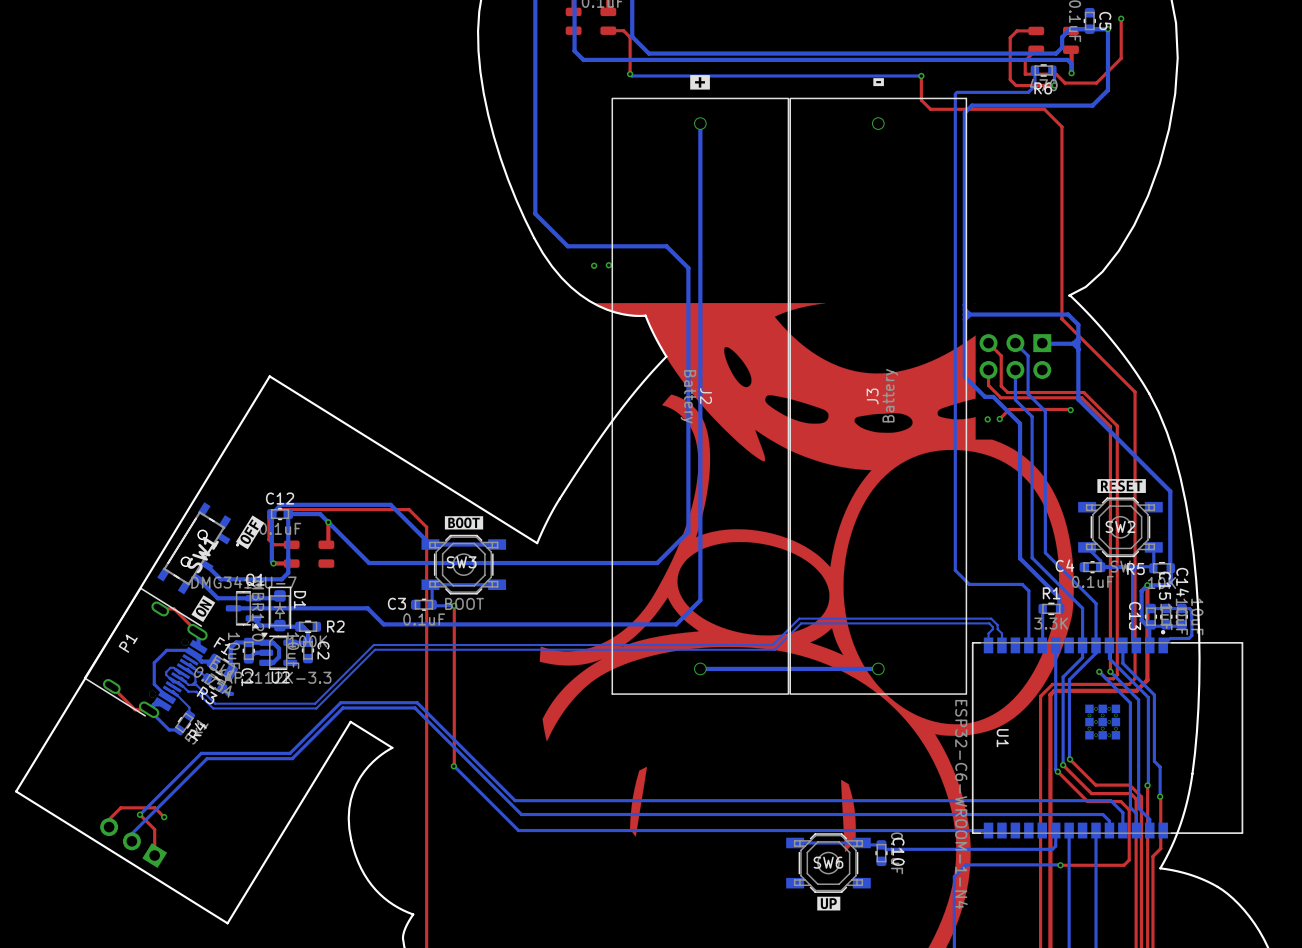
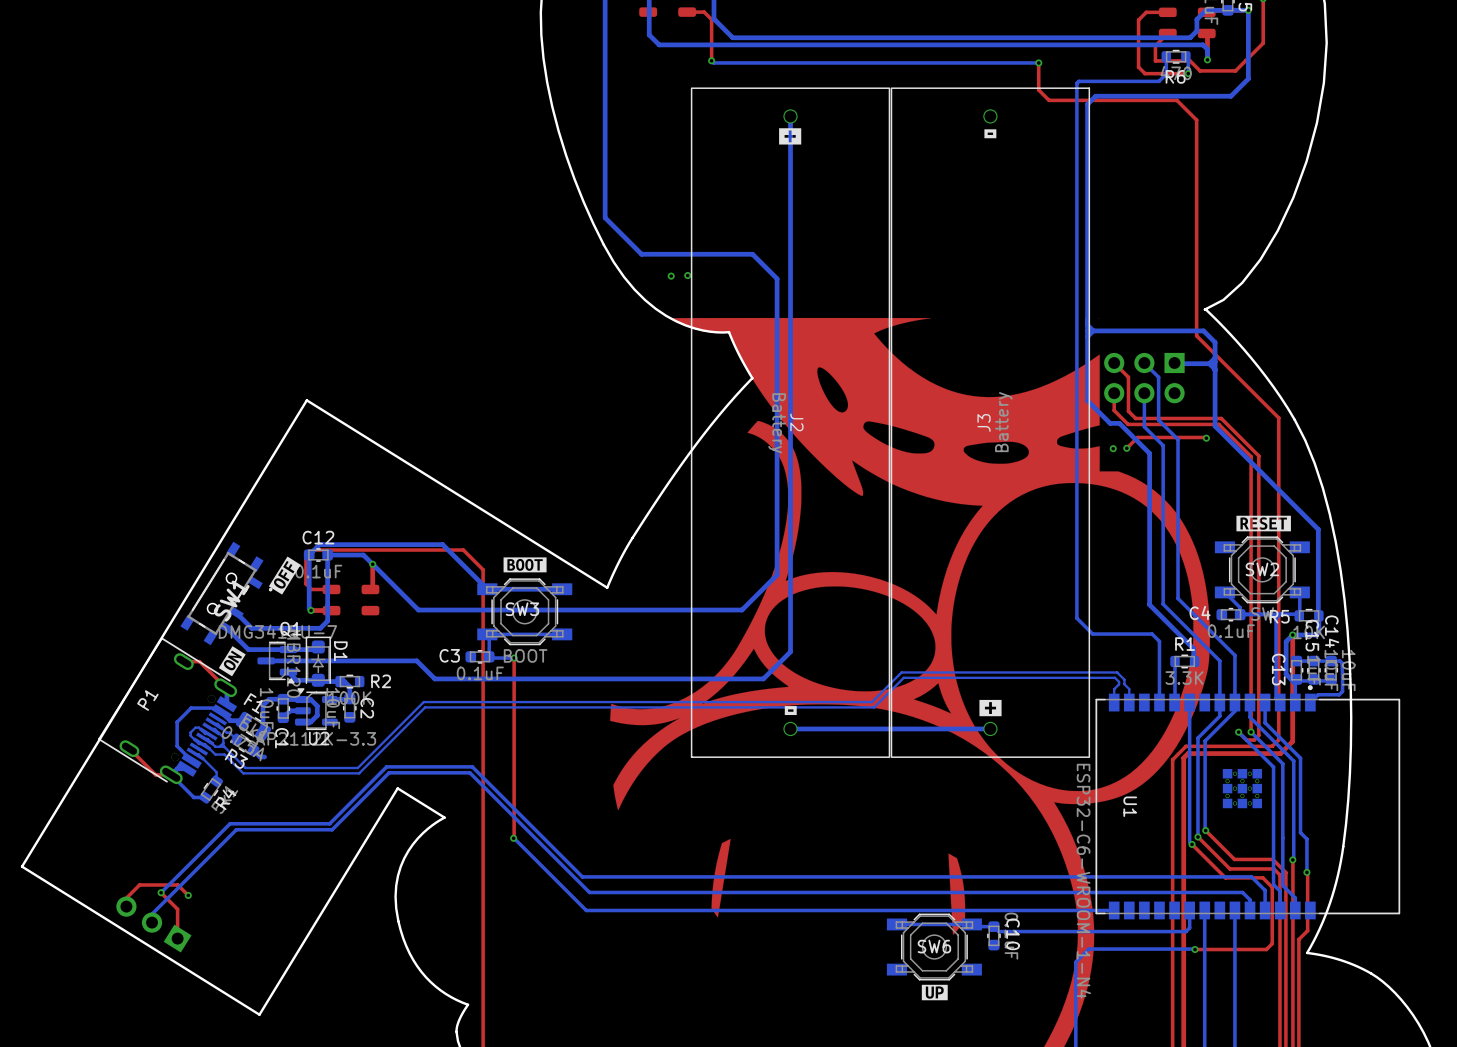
drawing position: (700, 82) -> (790, 136)
drawing position: (878, 82) -> (990, 133)
drawing: none -> [979, 699, 1002, 717]
drawing: none -> [784, 706, 797, 716]

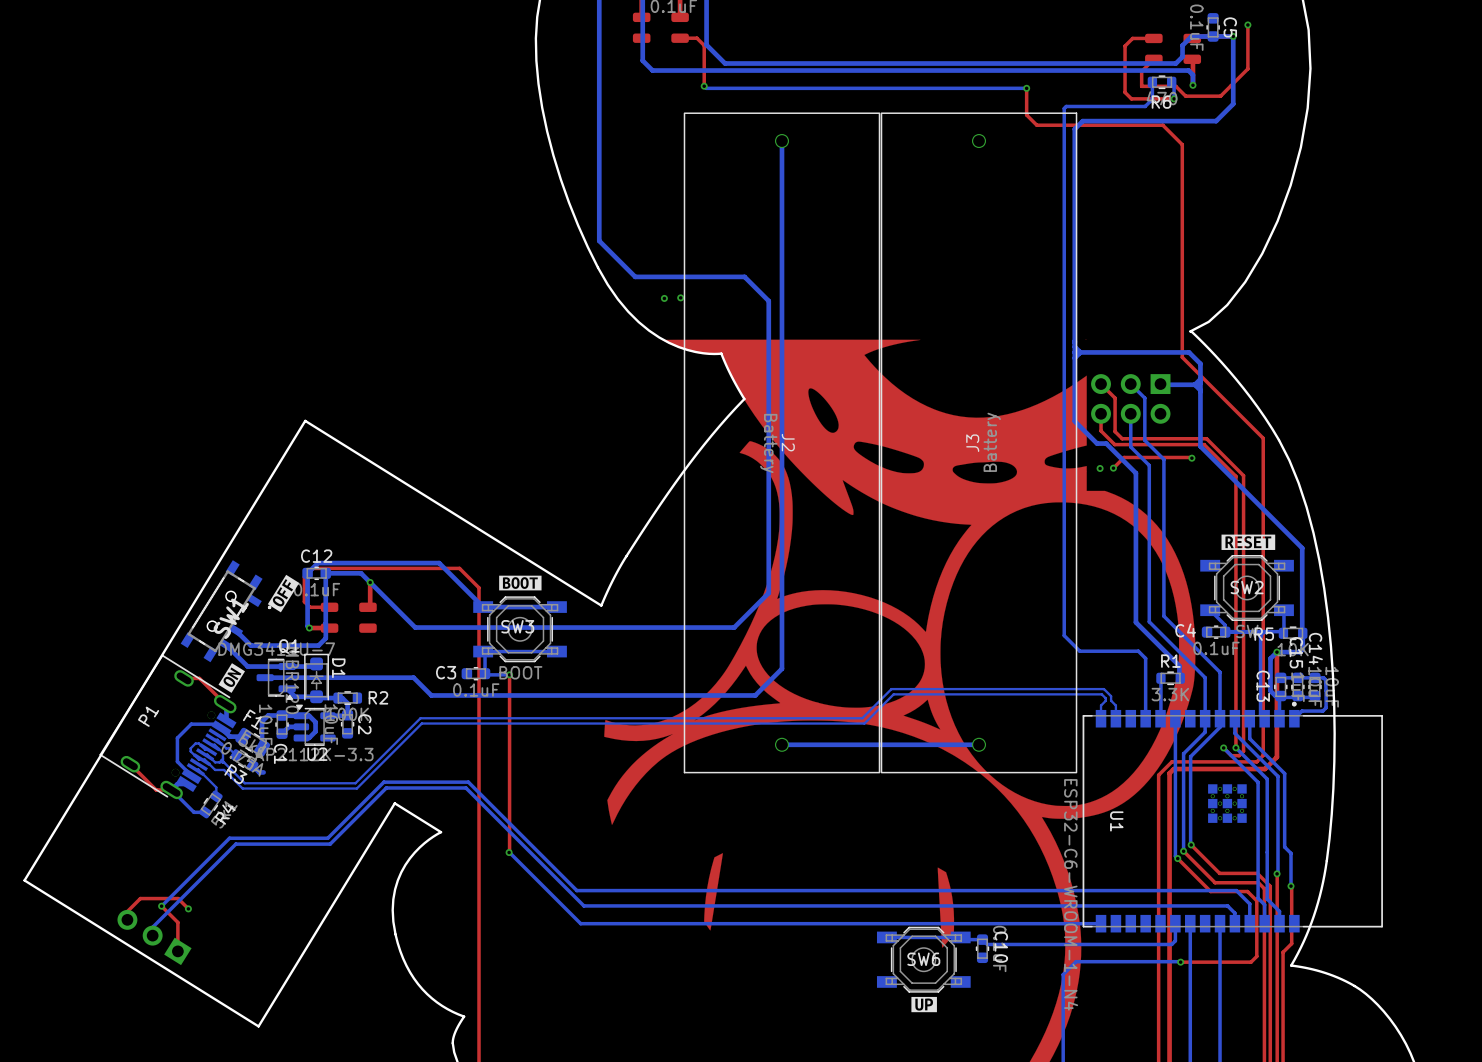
drawing: [779, 128, 802, 145] -> none
drawing: [984, 129, 997, 139] -> none
drawing: [979, 699, 1002, 717] -> none
drawing: [784, 706, 797, 716] -> none

